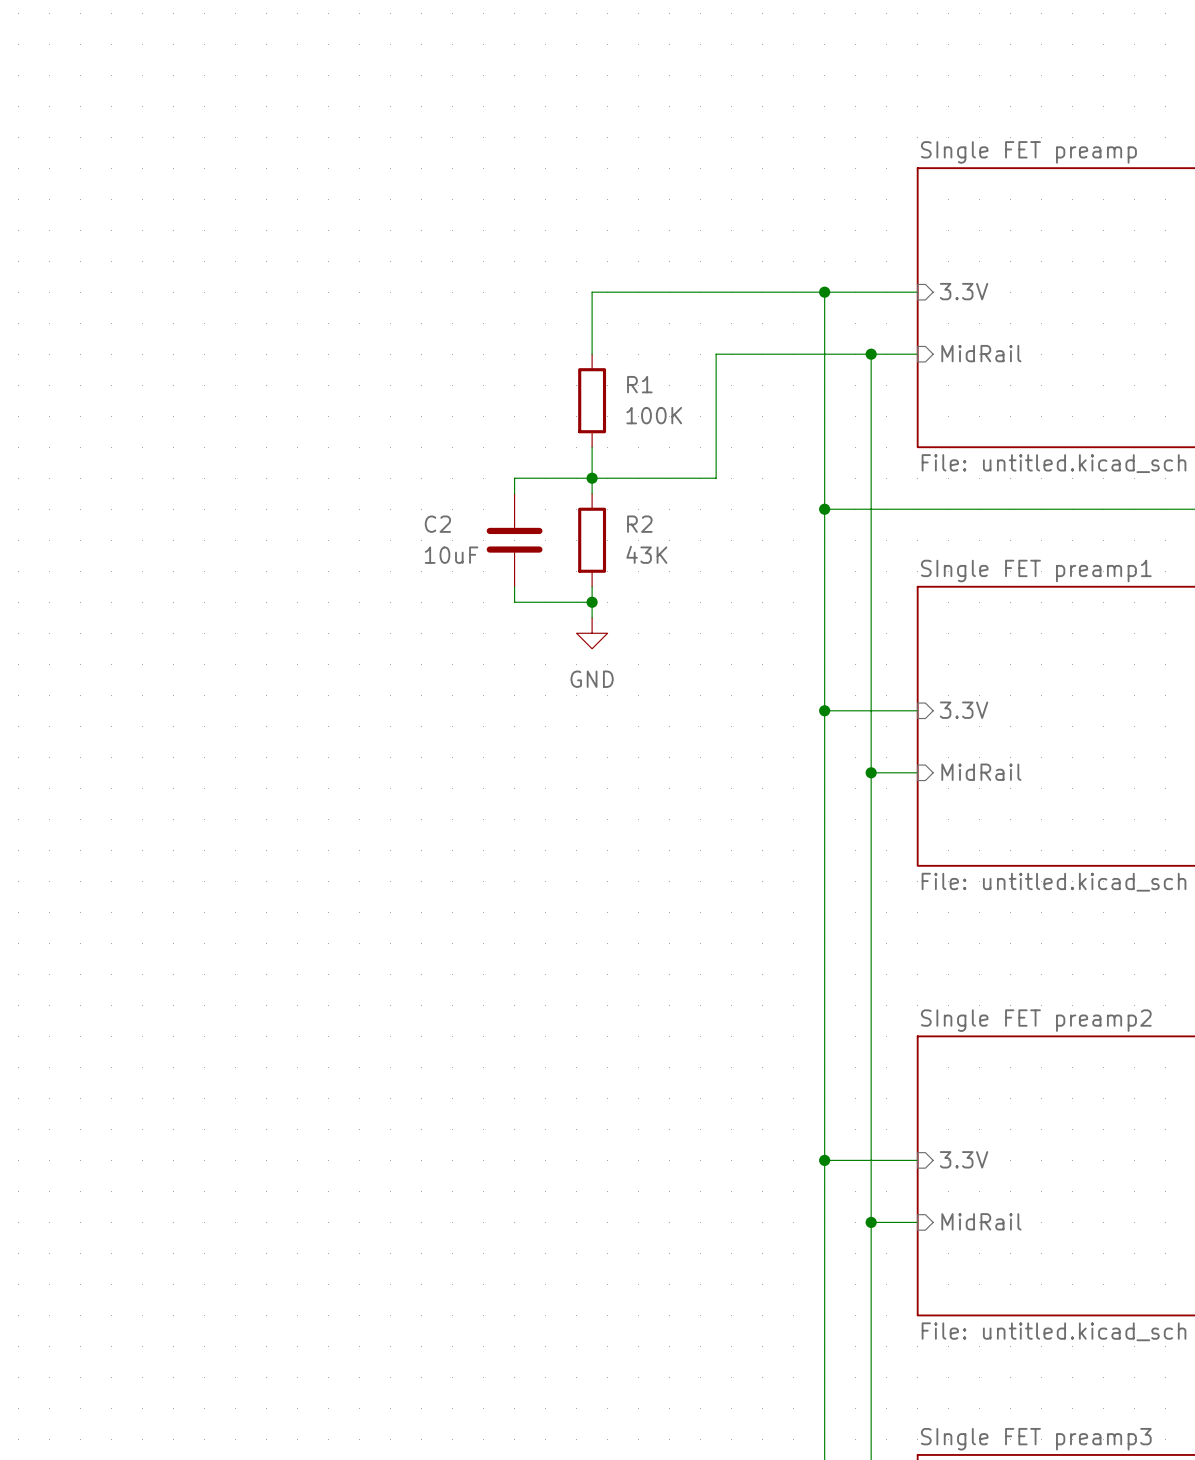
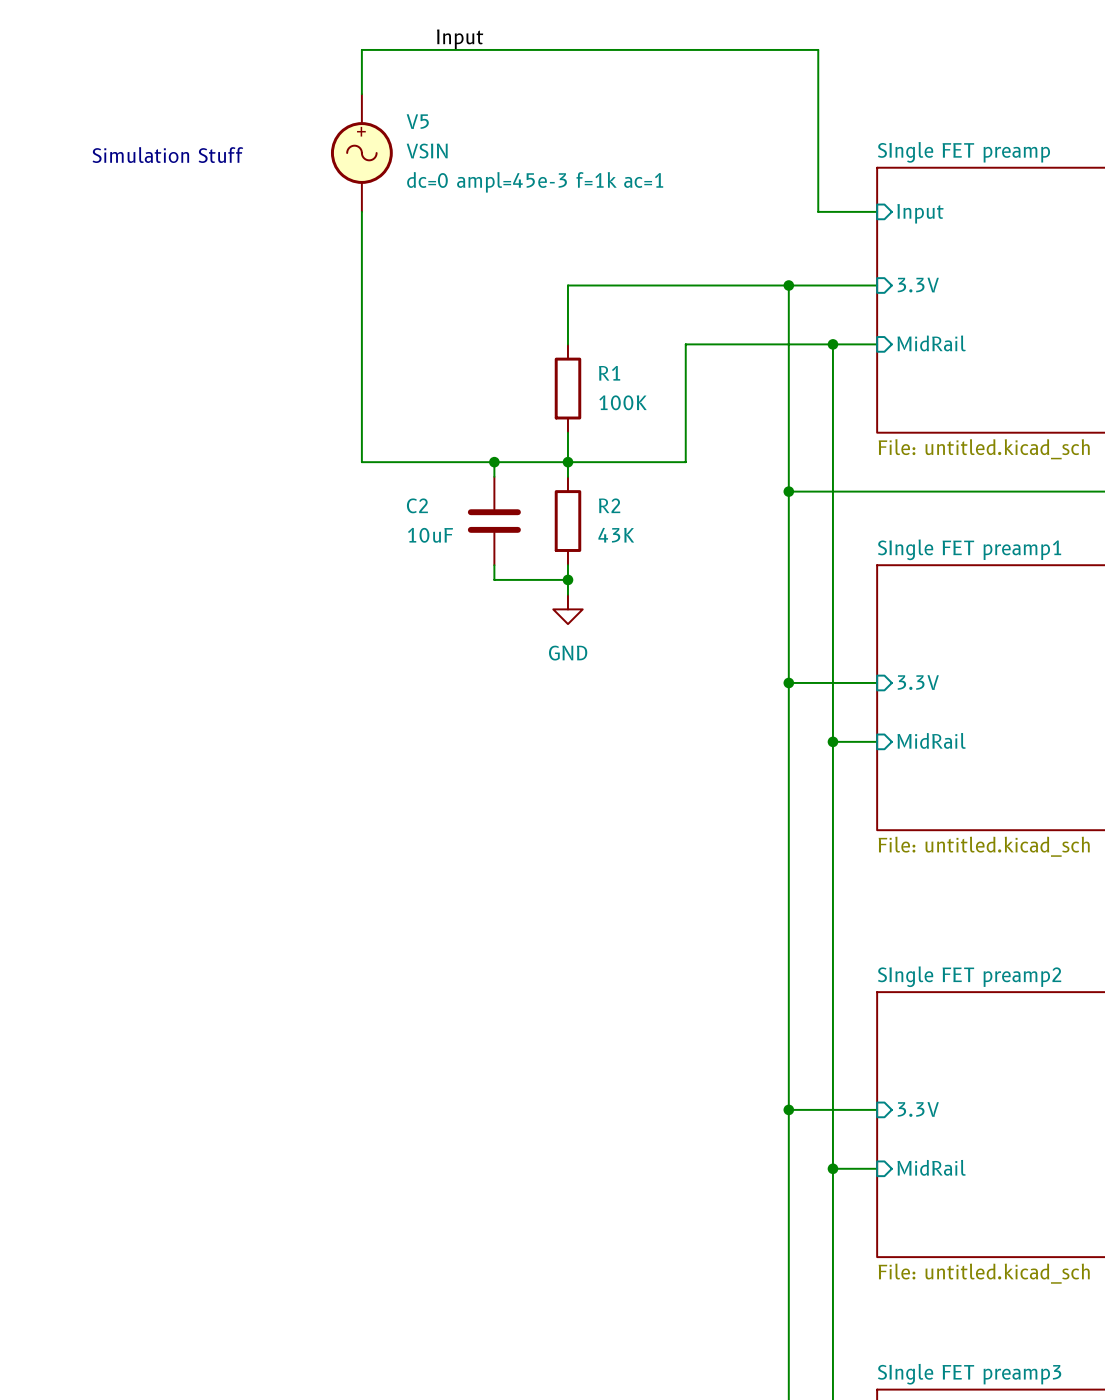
label: none -> Input (460, 39)
wire: none -> (361, 94) (361, 49) (818, 49) (818, 211) (877, 211)
V5: none -> VSIN (361, 153)
text: none -> Simulation Stuff (167, 155)
wire: none -> (361, 211) (361, 462) (494, 462)
sheet pin: none -> Input (920, 213)
junction: none -> (494, 462)

